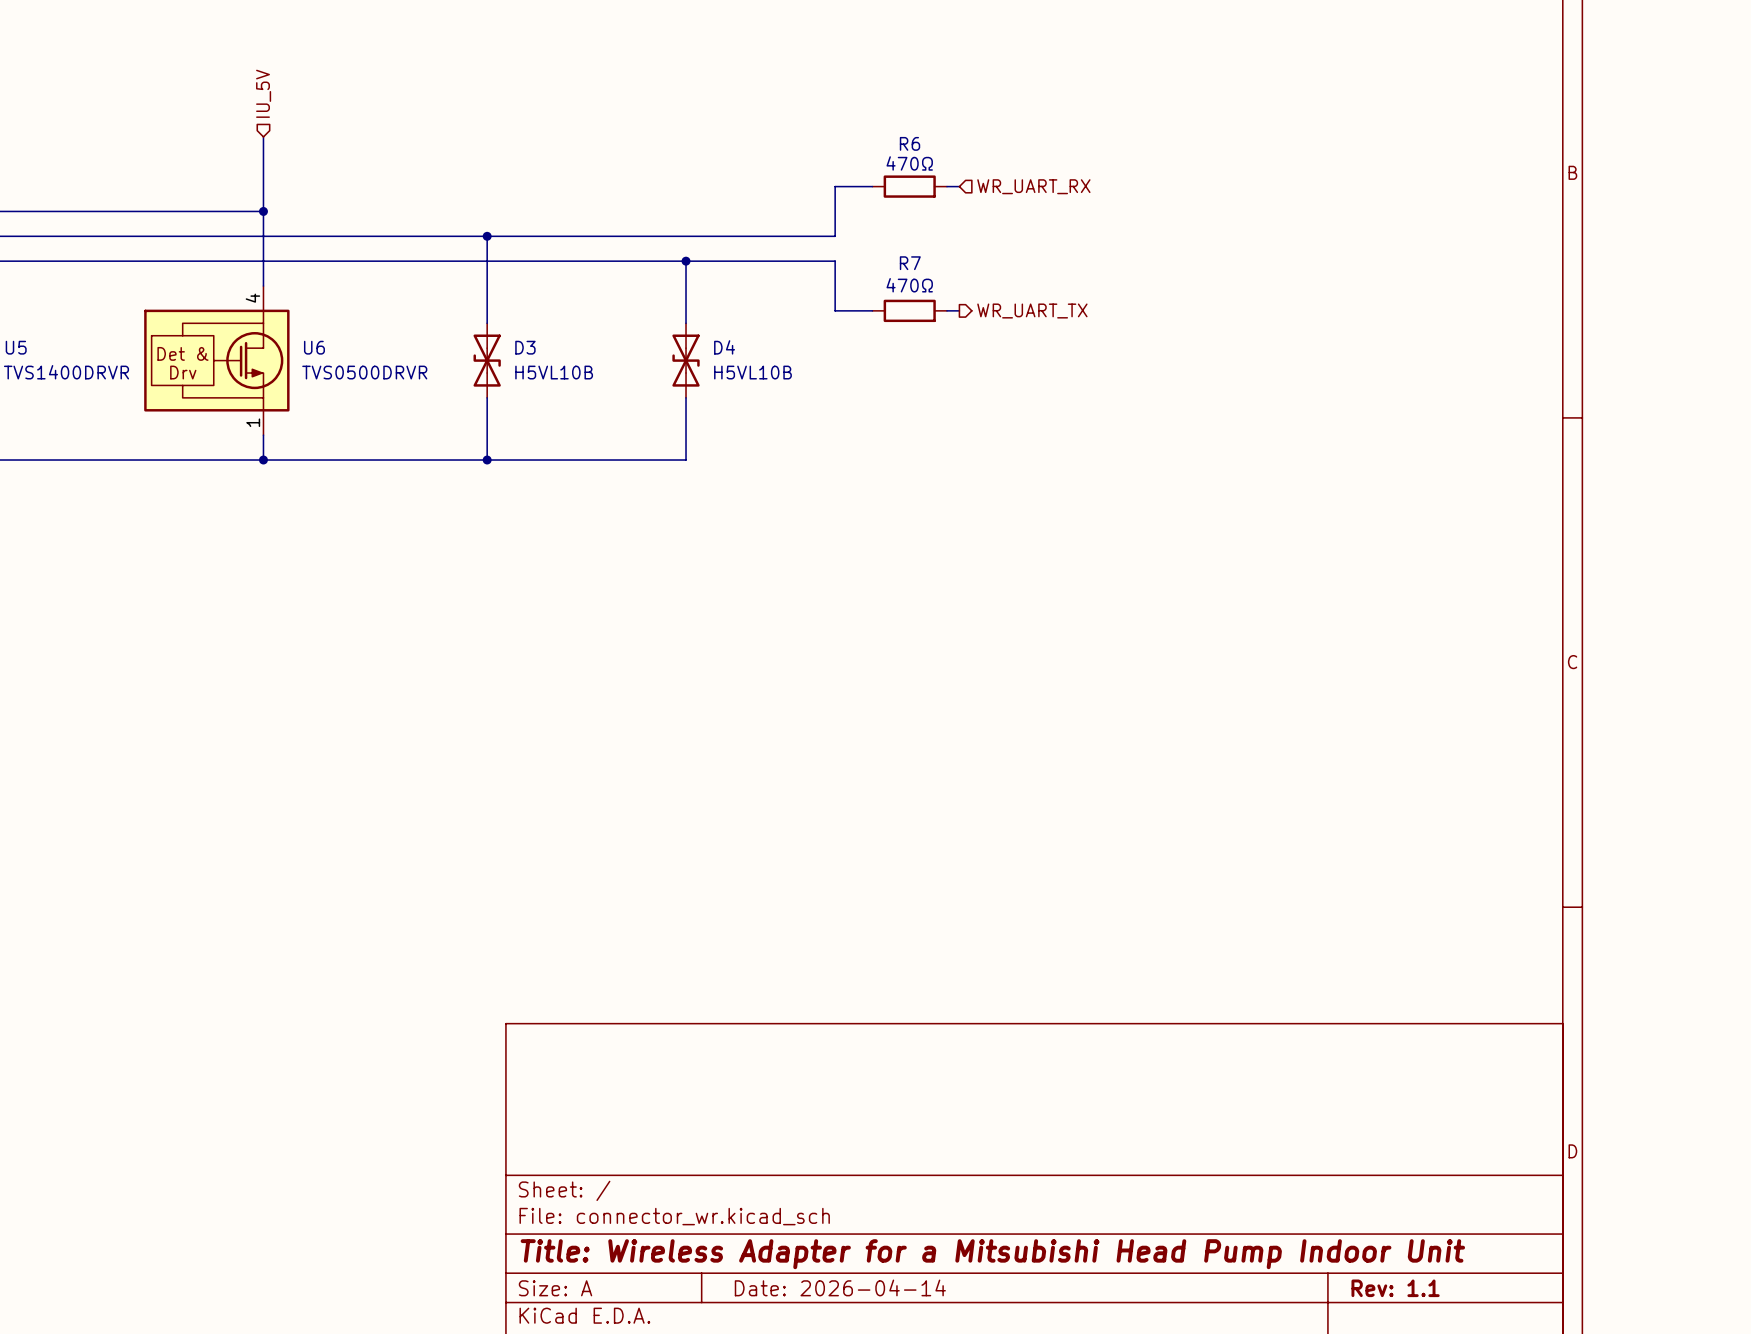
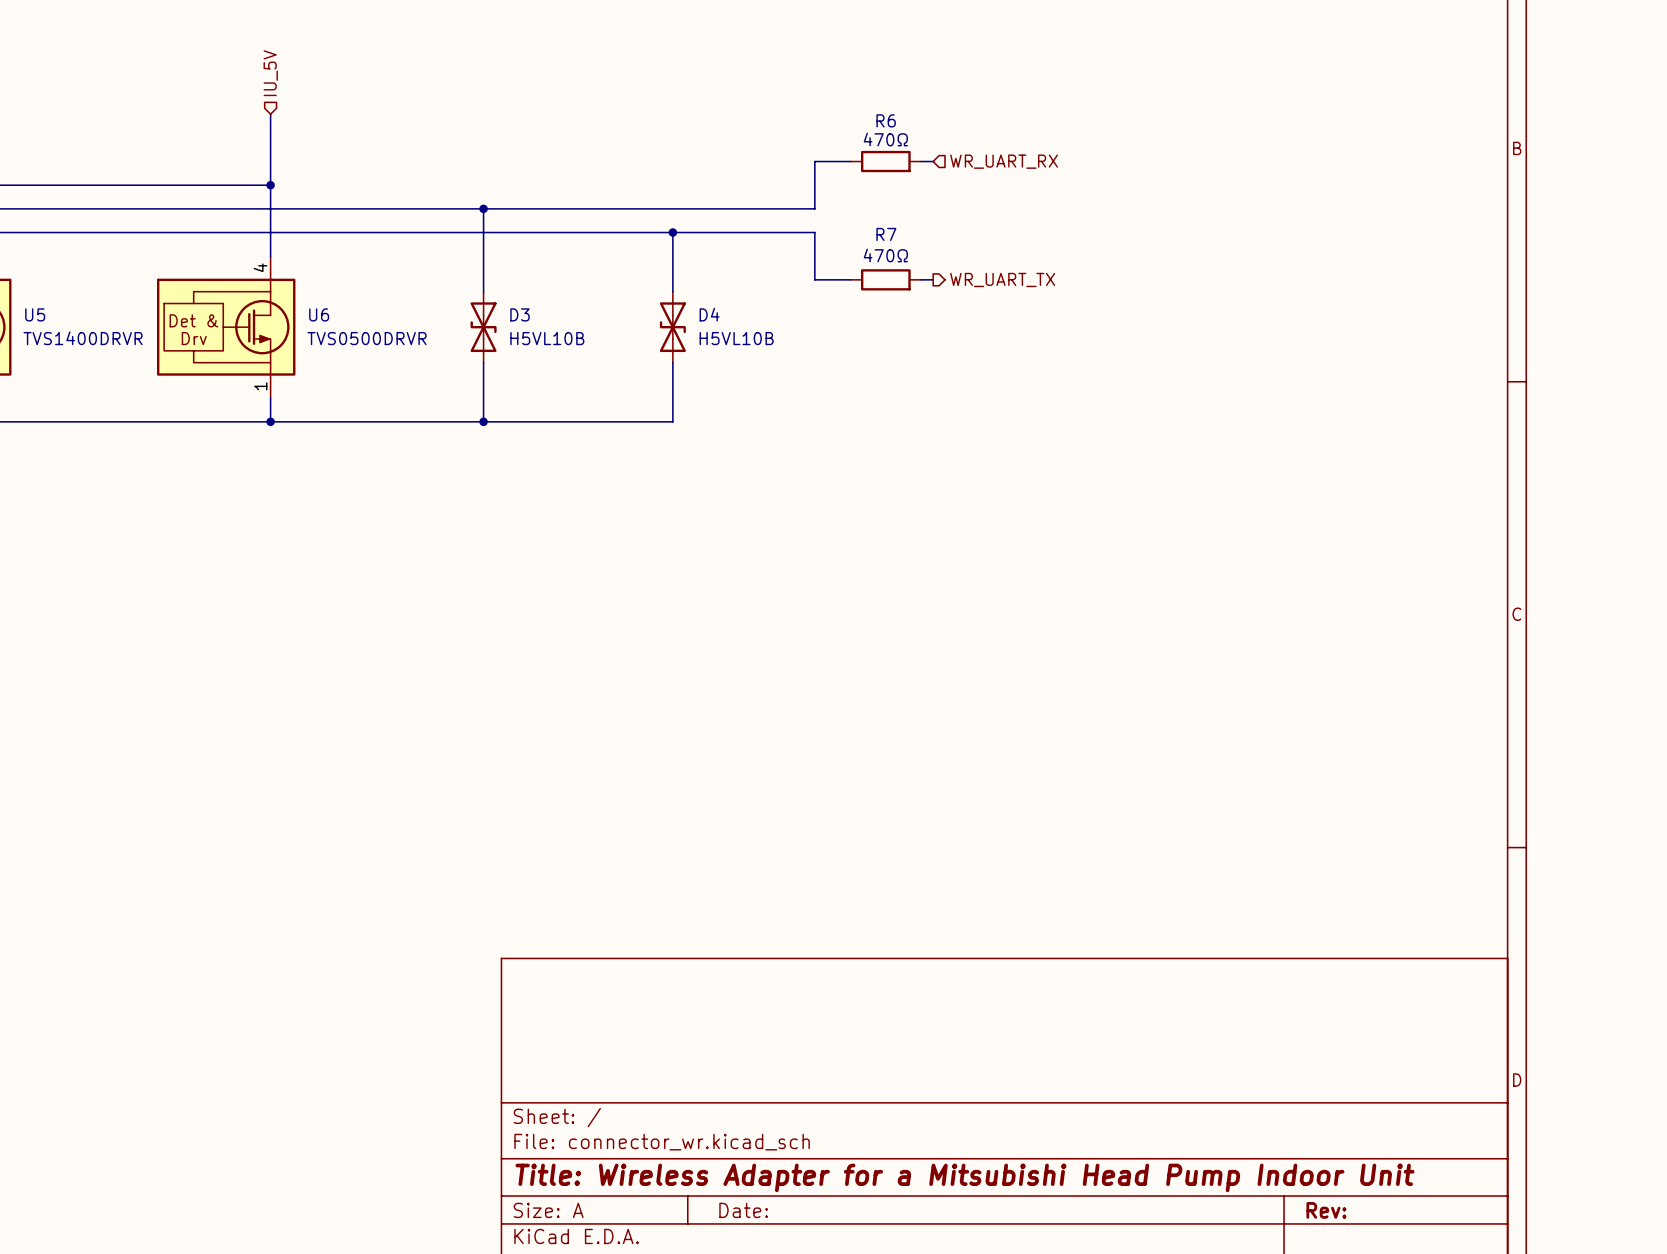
title block: Date: 2026-04-14 (840, 1287) -> Date: (743, 1210)
title block: Rev: 1.1 (1395, 1288) -> Rev: (1326, 1210)

